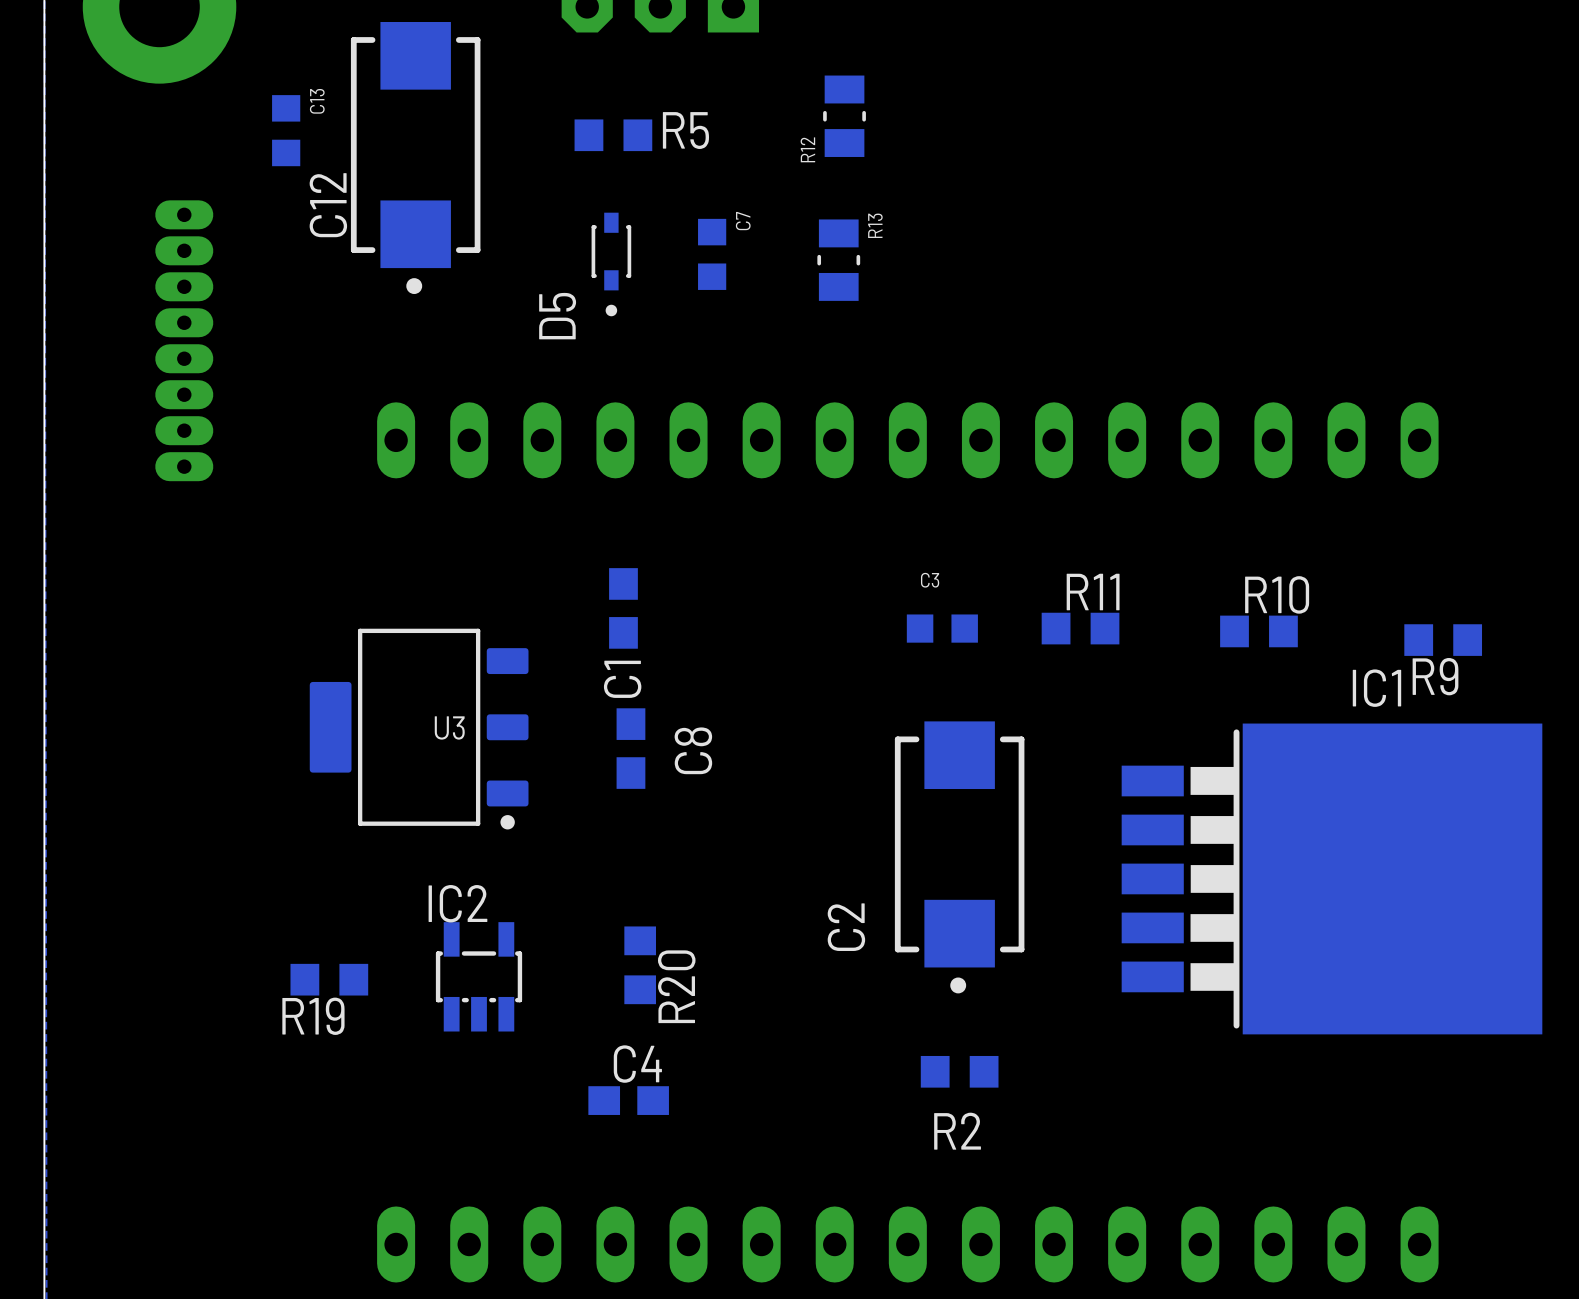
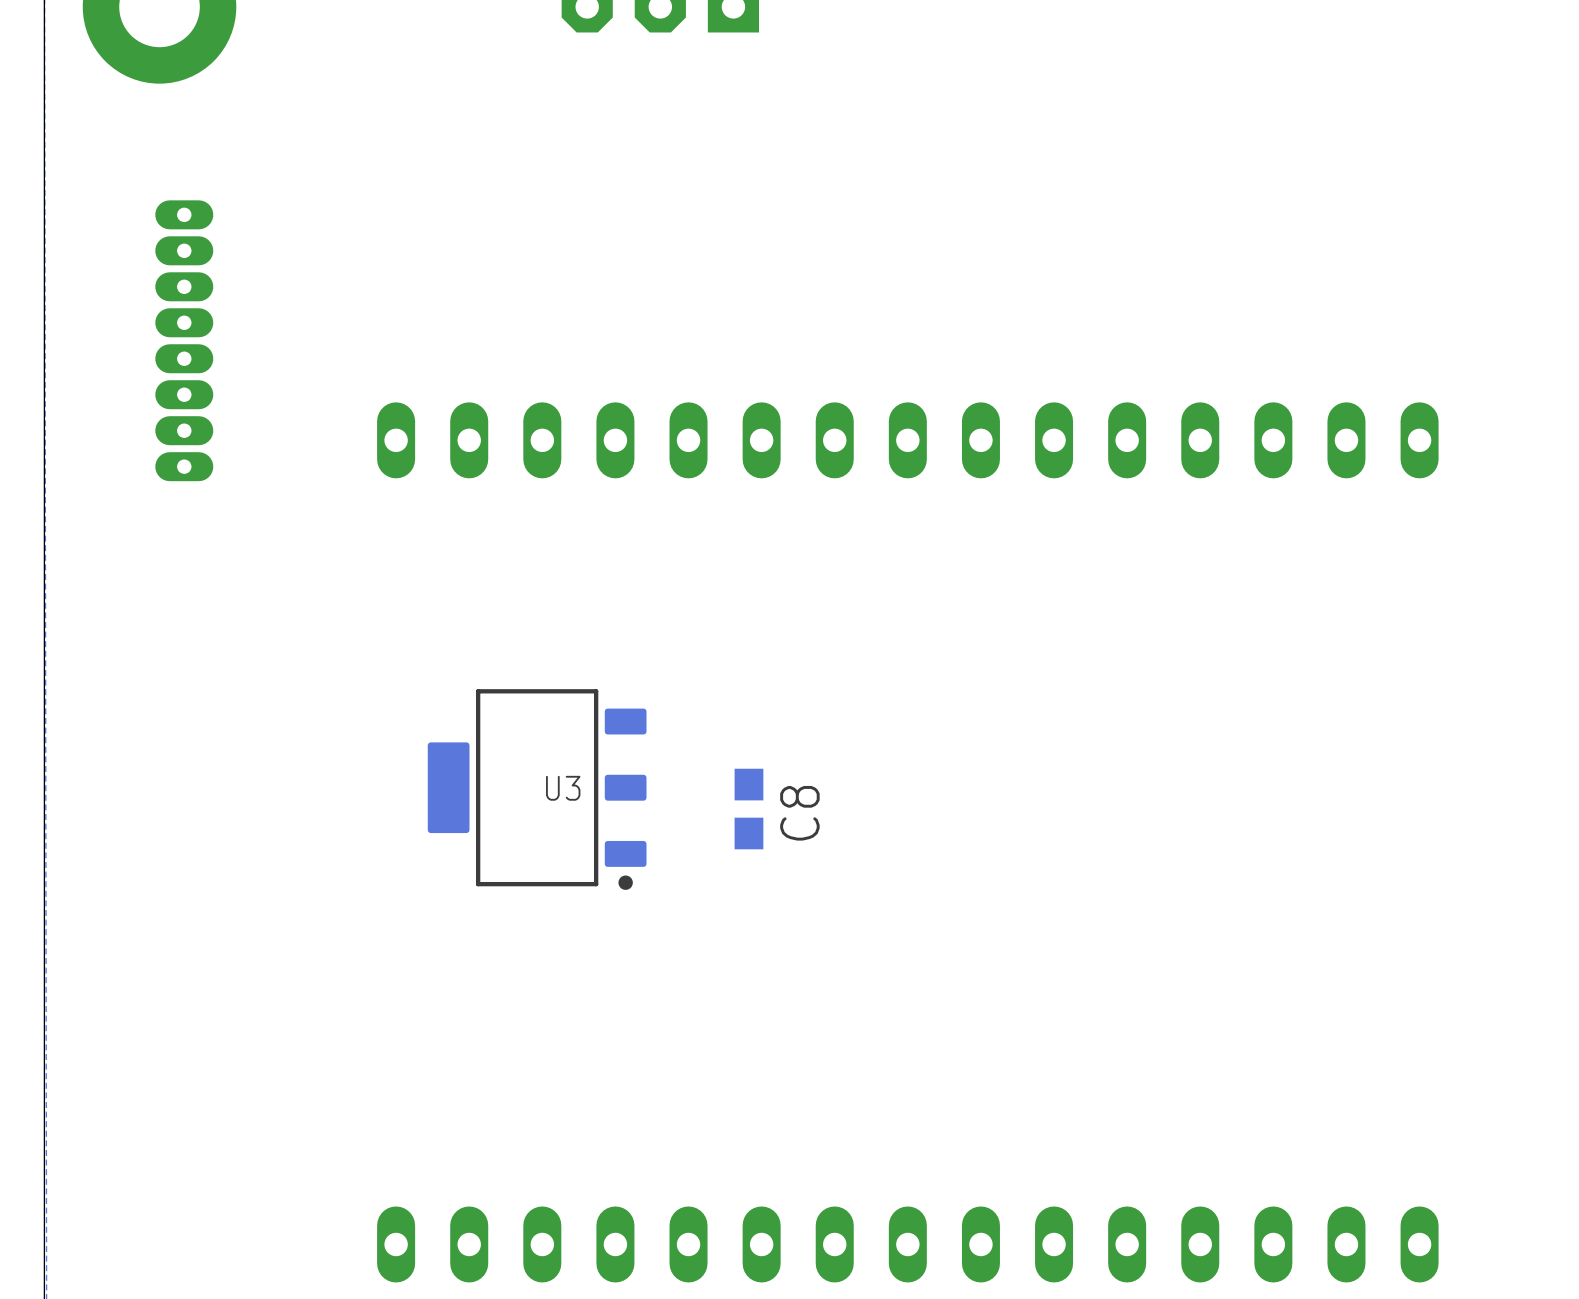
R12: (844, 116) -> none
C13: (286, 130) -> none
R5: (613, 135) -> none
C12: (415, 158) -> none
C7: (712, 254) -> none
R13: (838, 260) -> none
D5: (611, 264) -> none
C1: (623, 608) -> none
C3: (942, 628) -> none
R11: (1080, 628) -> none
R10: (1258, 631) -> none
R9: (1443, 640) -> none
U3 position: (419, 729) -> (537, 789)
C8 position: (630, 748) -> (748, 809)
C8 name position: C8 (693, 750) -> C8 (799, 813)
C2: (959, 857) -> none
IC1: (1331, 878) -> none
R20: (640, 965) -> none
IC2: (479, 976) -> none
R19: (329, 979) -> none
R2: (959, 1071) -> none
C4: (628, 1100) -> none

